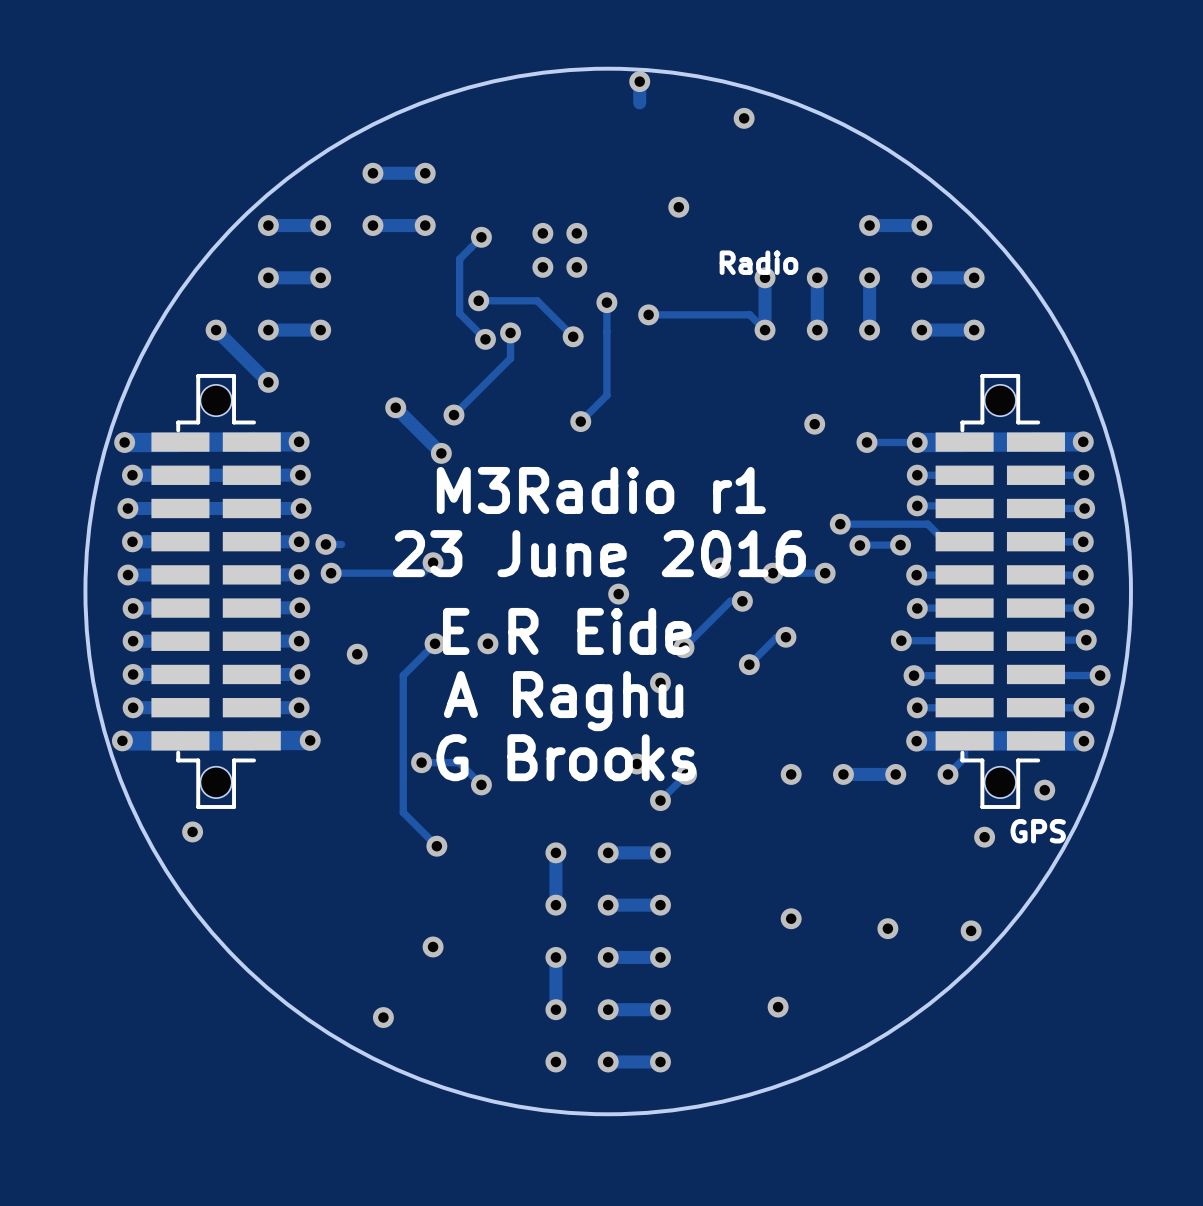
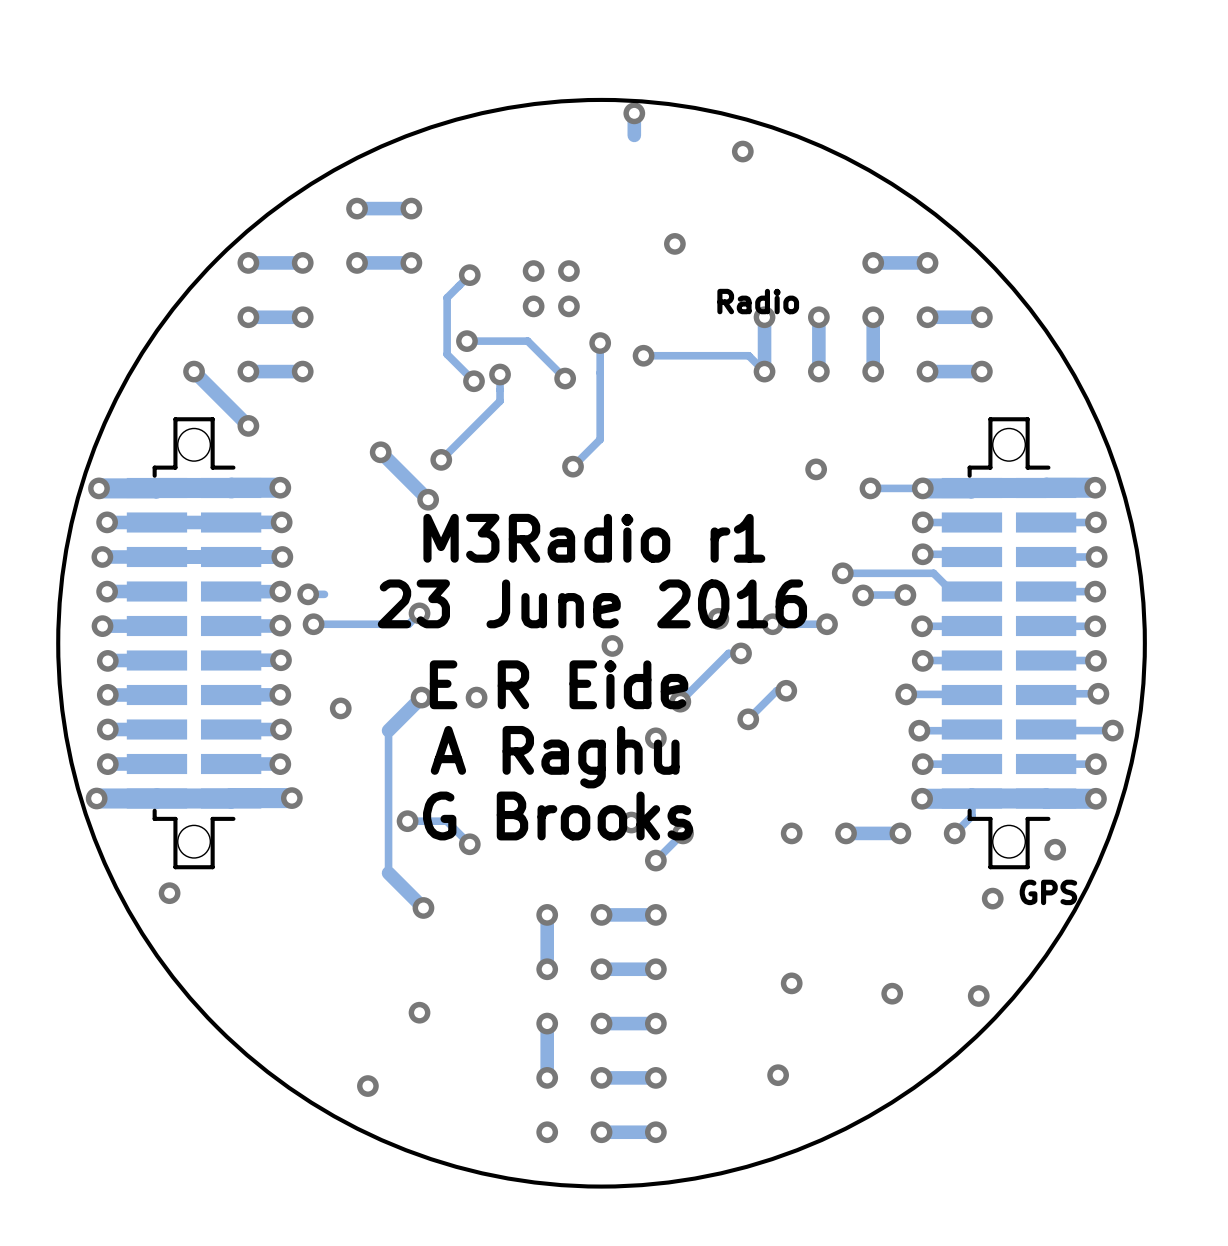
track width: thin (435, 643) (403, 675) -> thick (421, 697) (388, 730)
track width: thin (403, 812) (436, 846) -> thick (388, 873) (423, 907)

